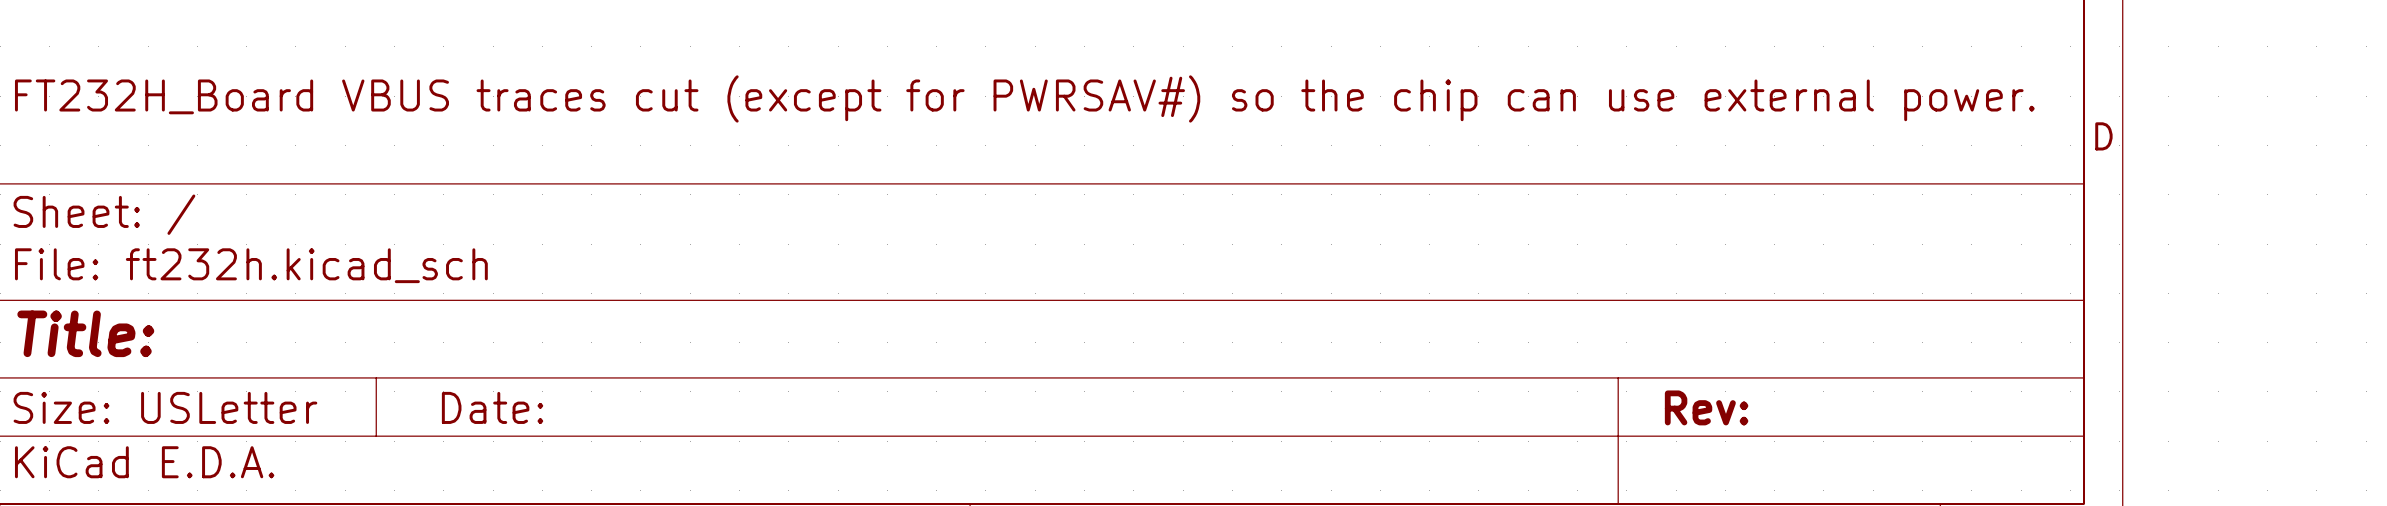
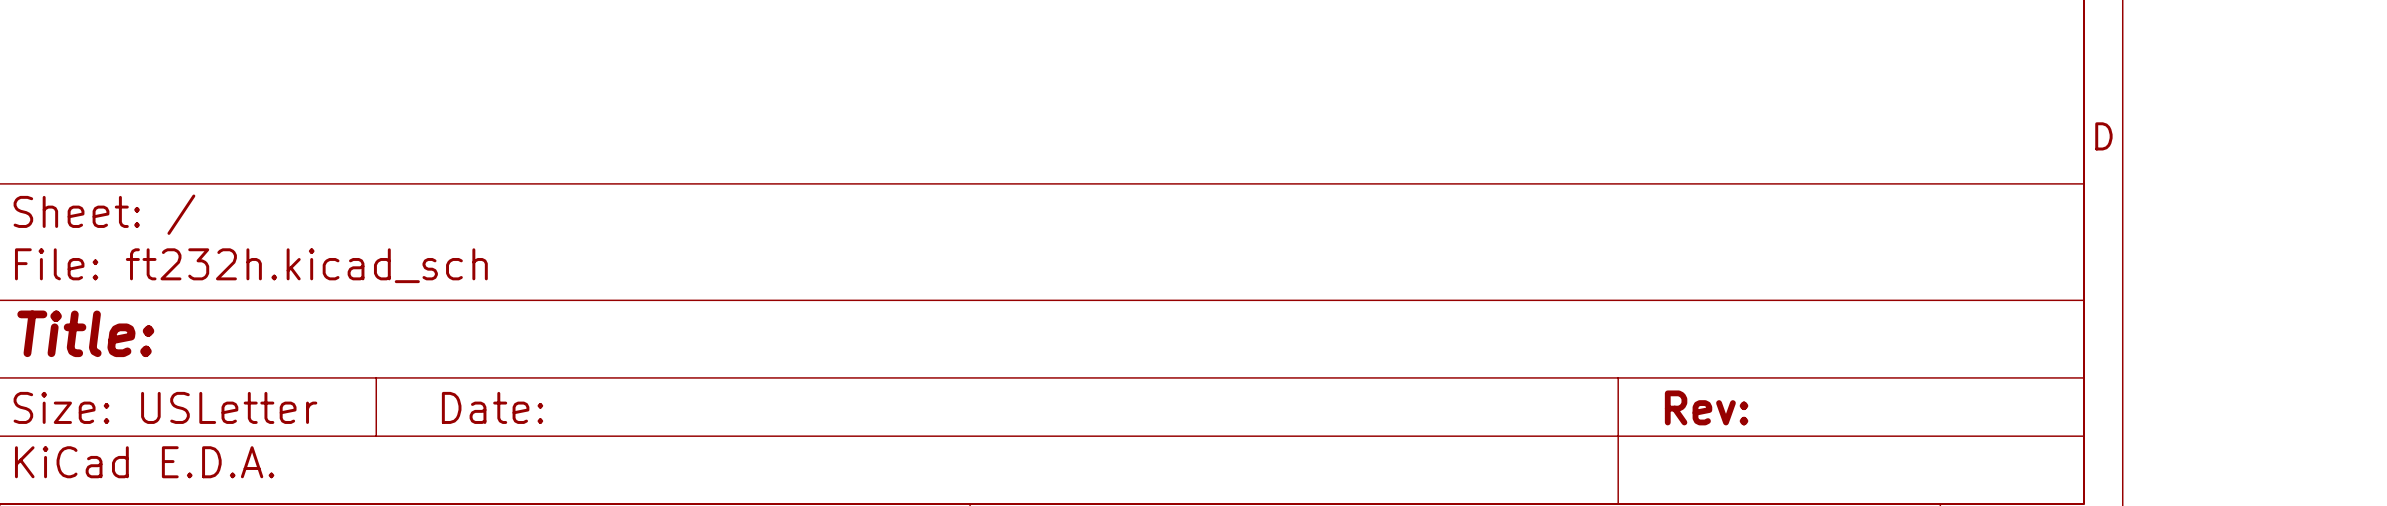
title block: FT232H_Board VBUS traces cut (except for PWRSAV#) so the chip can use external power. (1024, 98) -> none

